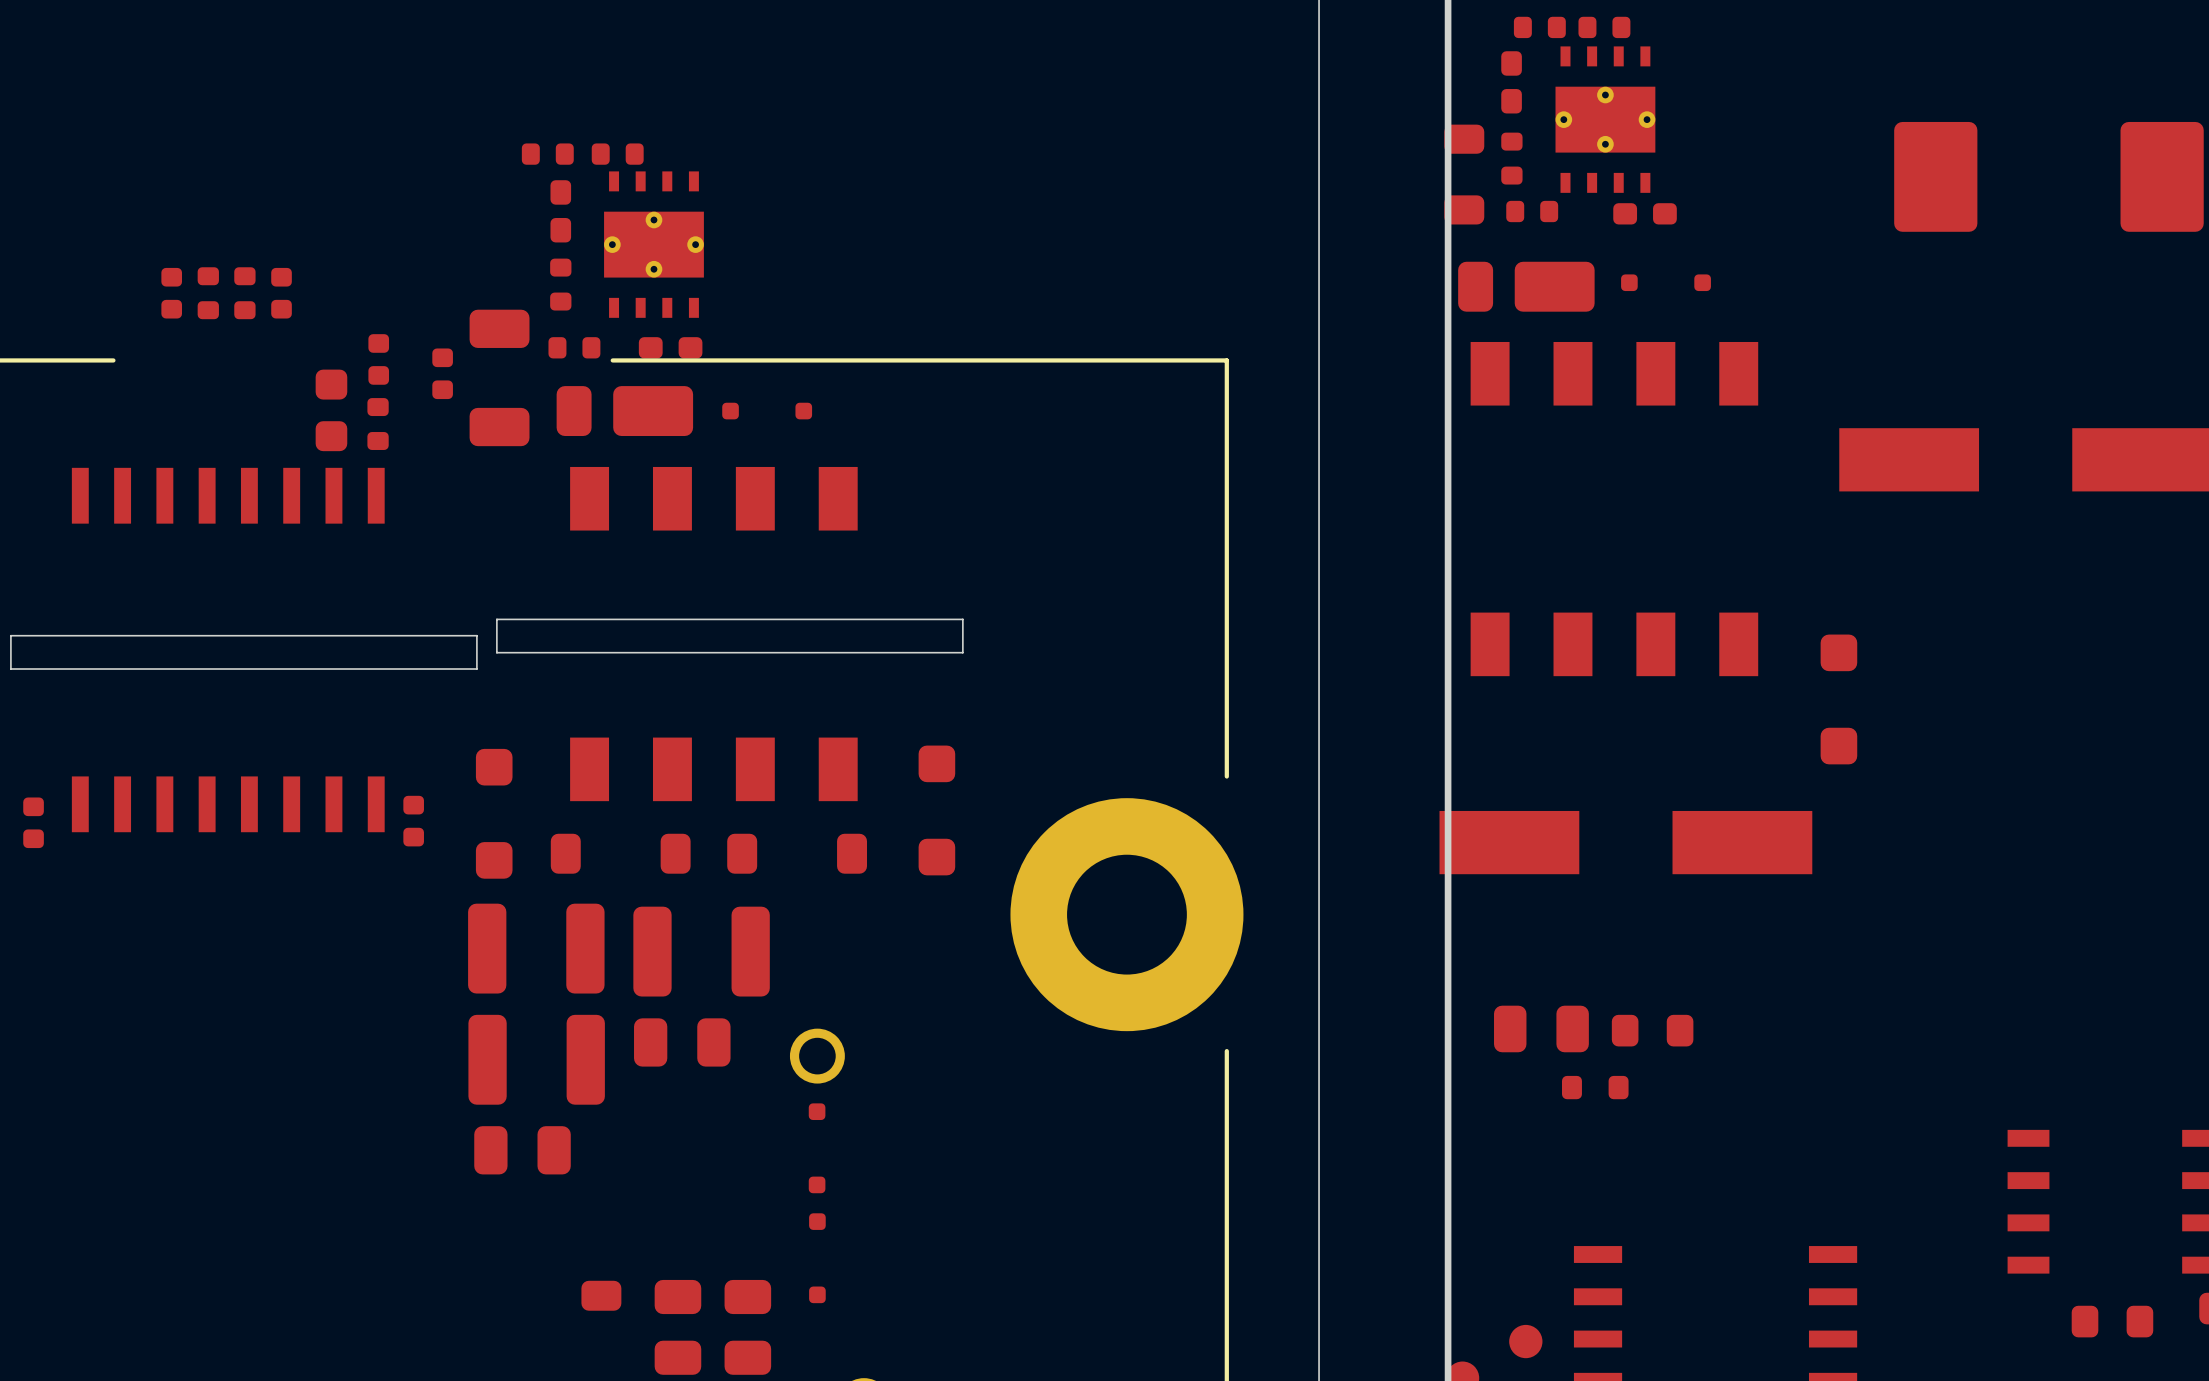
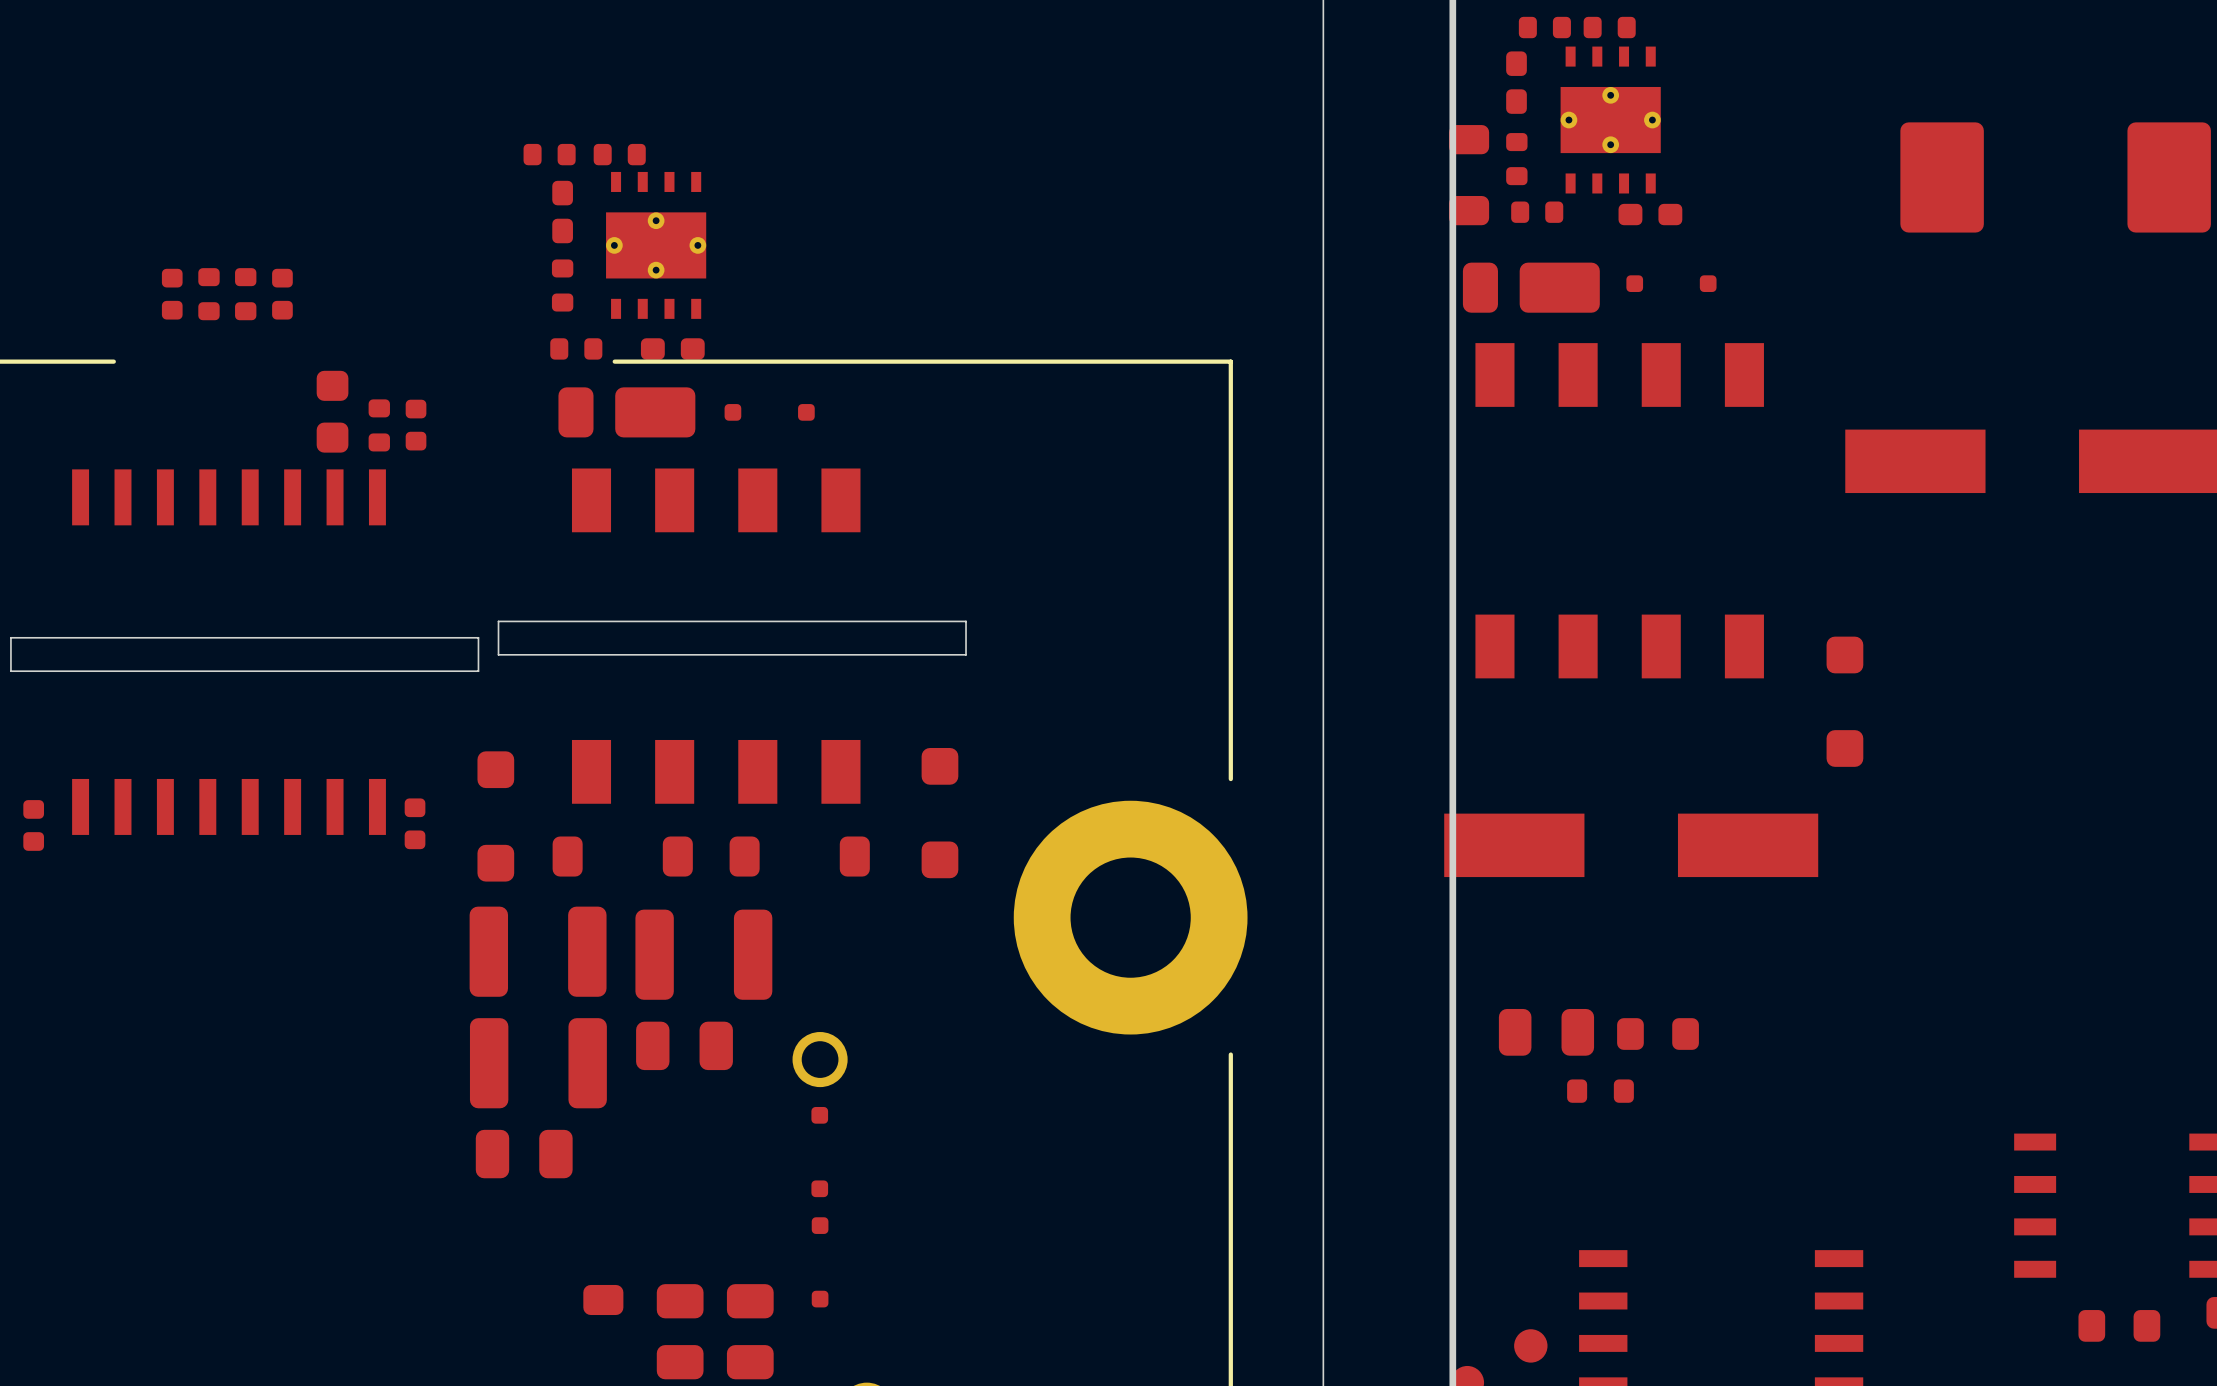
part: (378, 359) -> none
part: (442, 373) -> none
part: (499, 377) -> none
part: none -> (416, 425)

